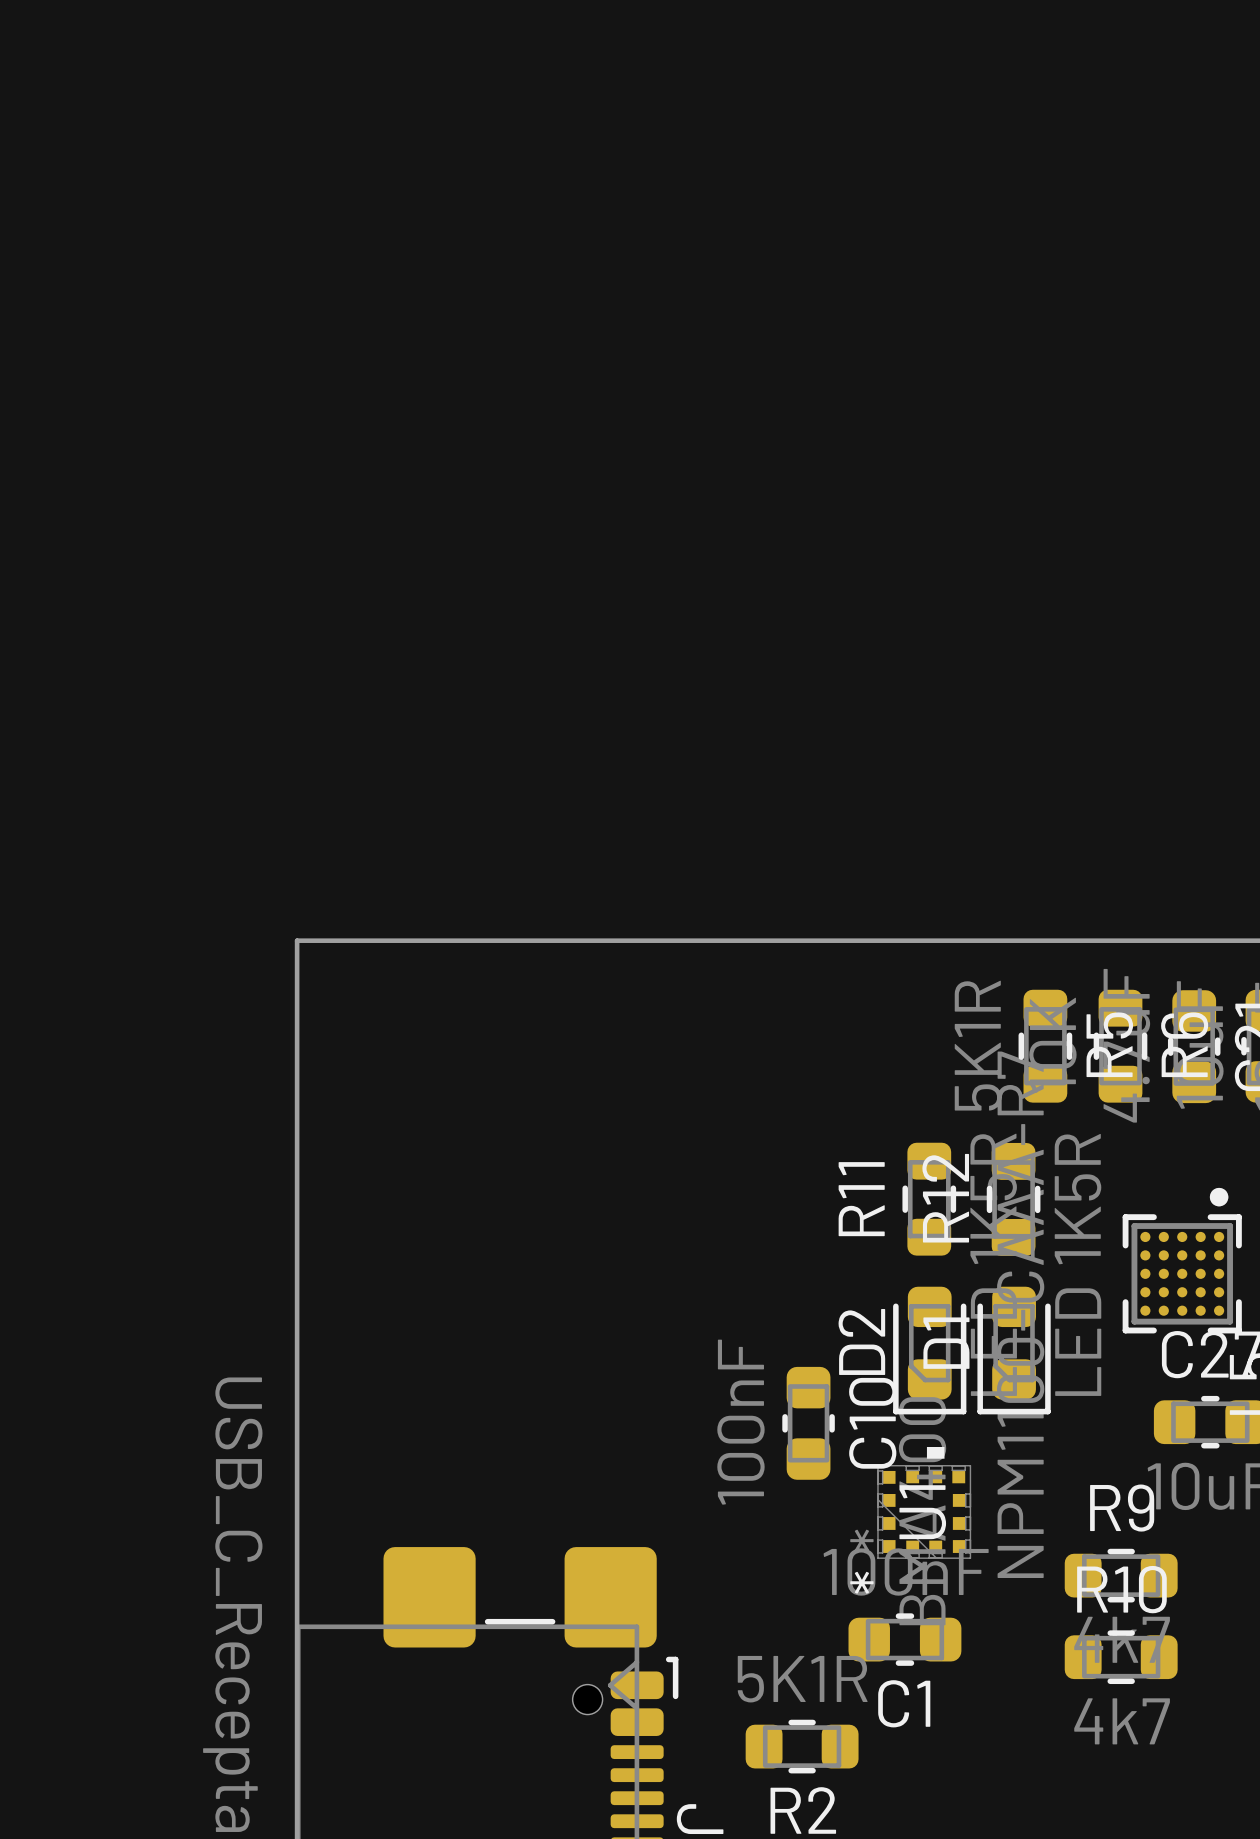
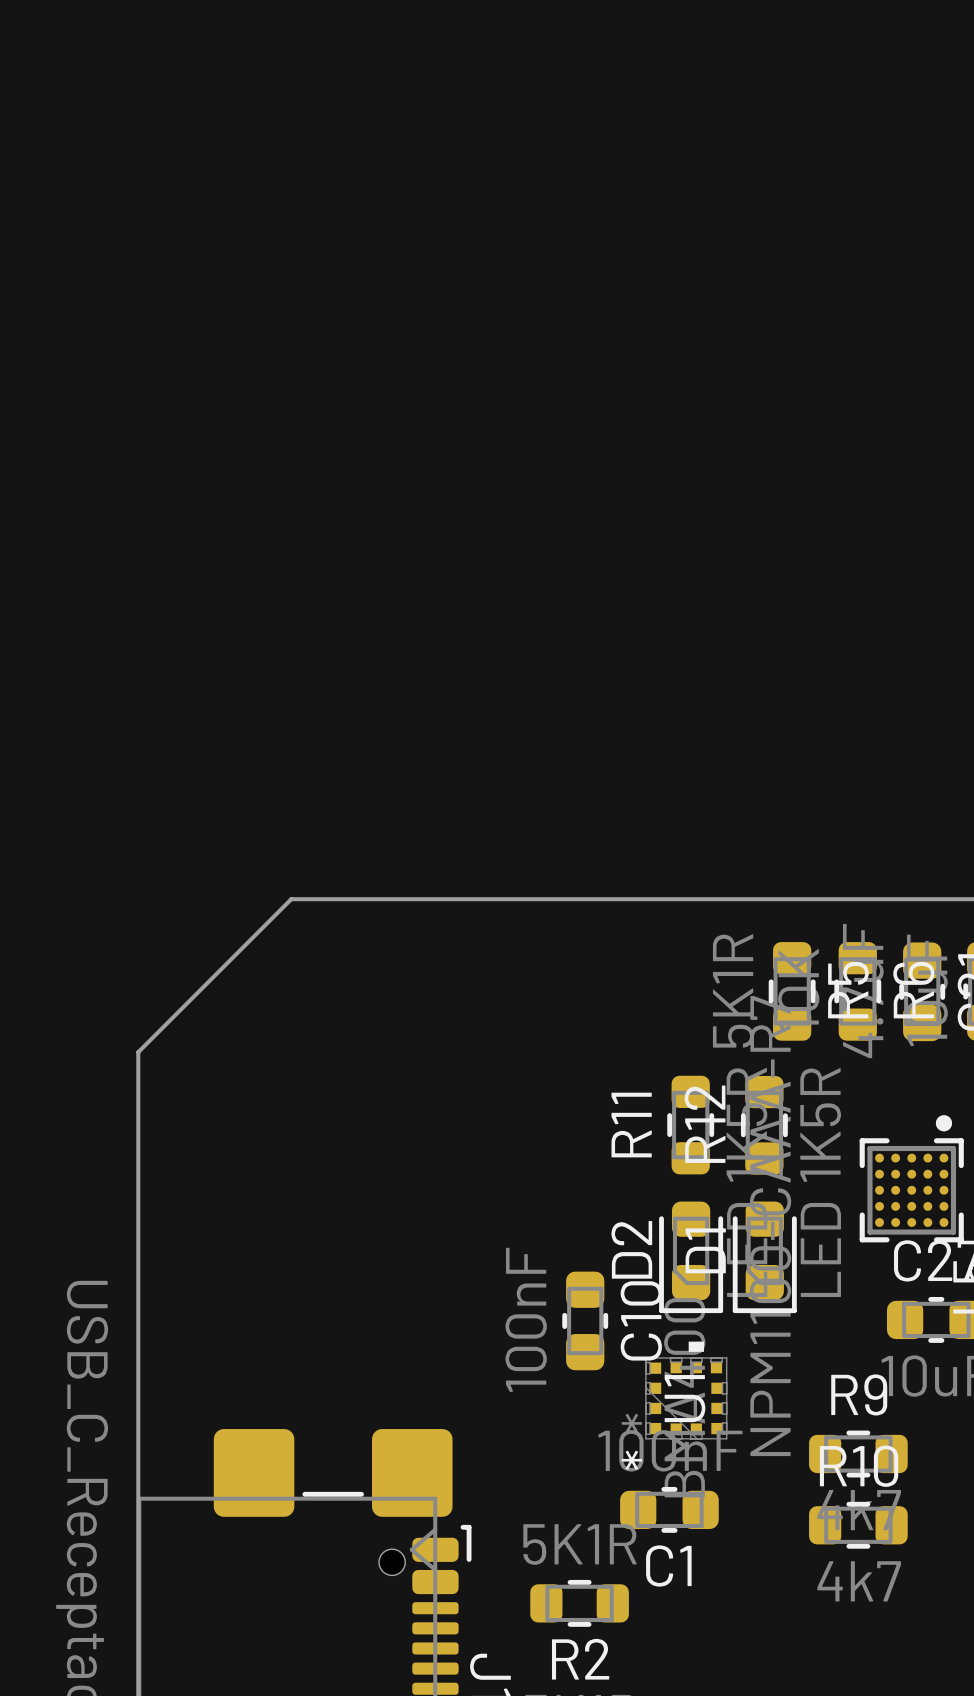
board edge: (472, 940) (297, 940) (297, 1115) -> (291, 899) (138, 1052)

